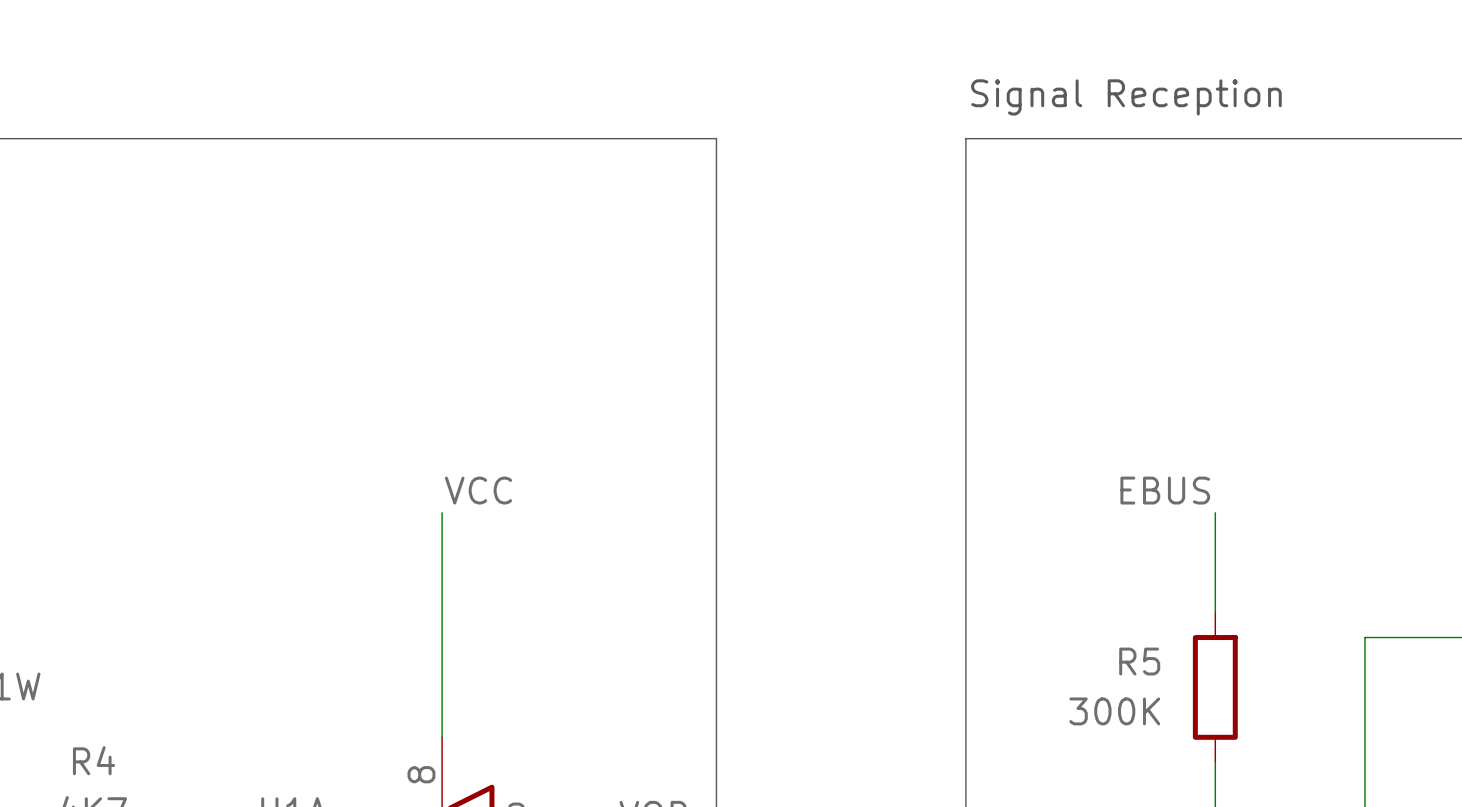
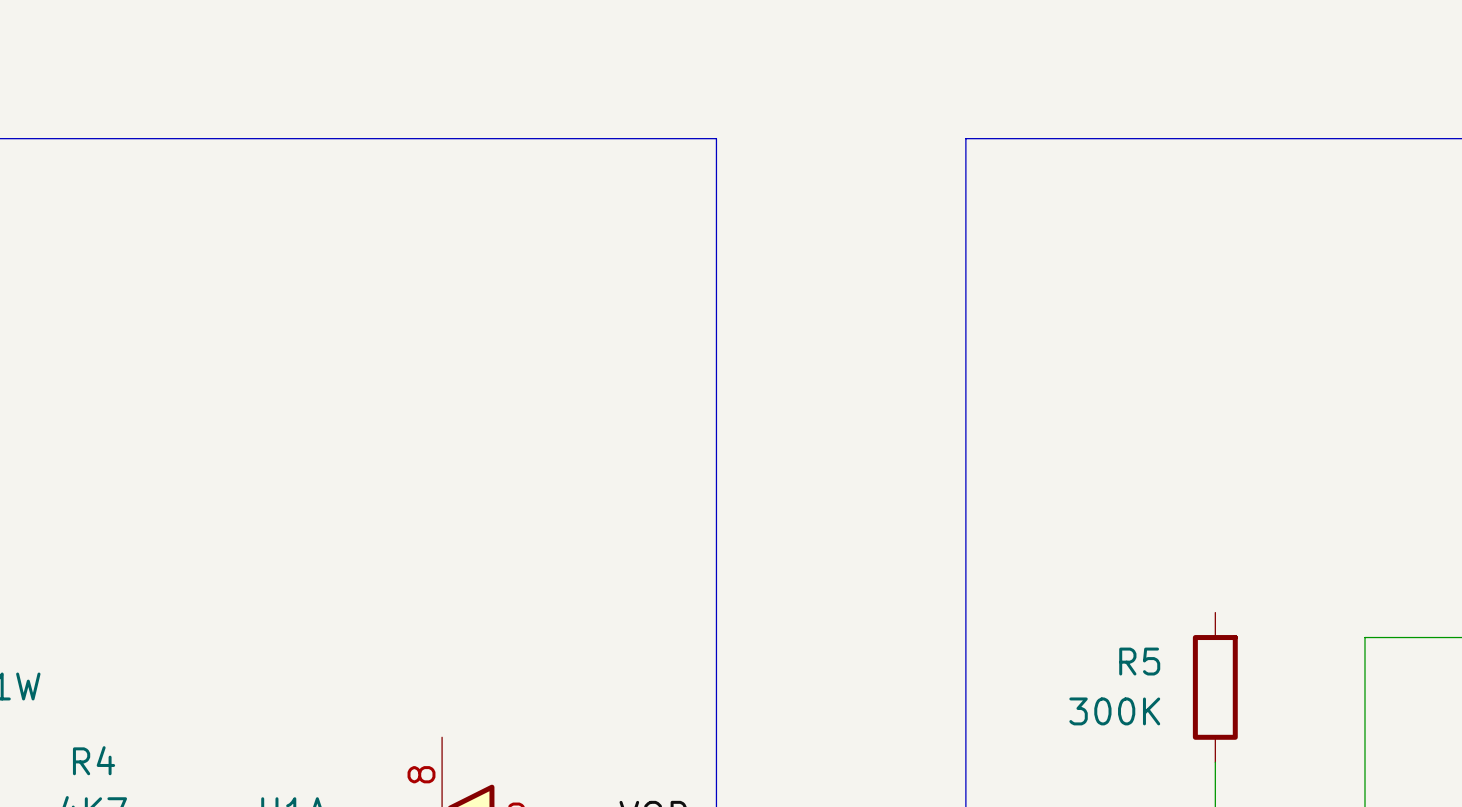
text: Signal Reception (1126, 97) -> none
label: VCC (478, 490) -> none
label: EBUS (1165, 490) -> none
wire: (442, 512) (442, 737) -> none
wire: (1215, 512) (1215, 612) -> none

